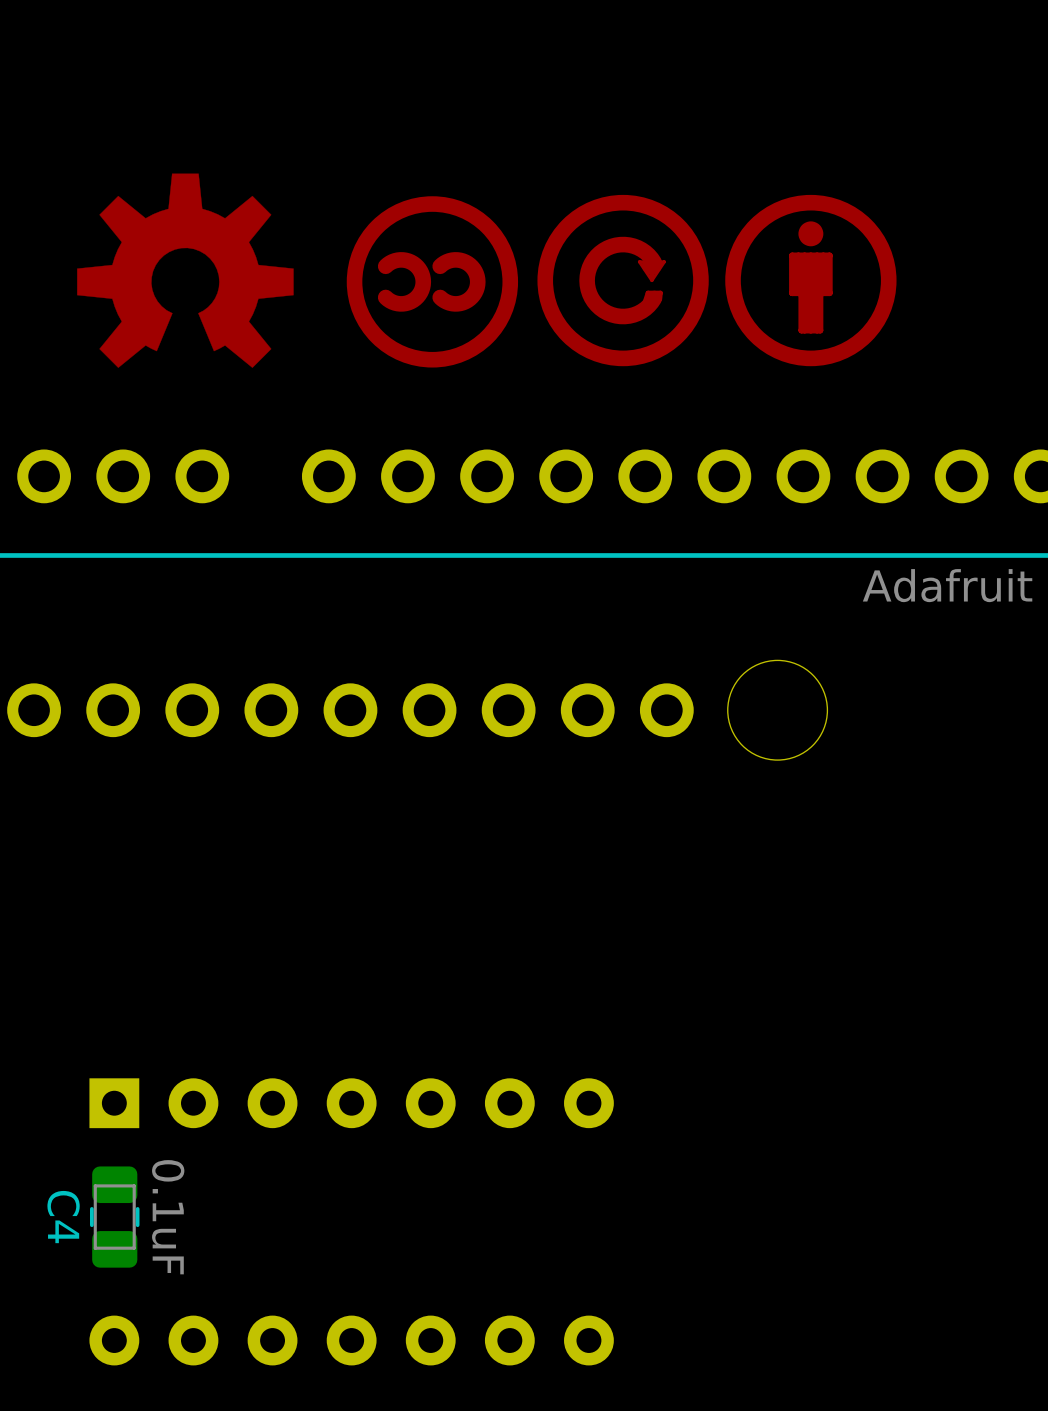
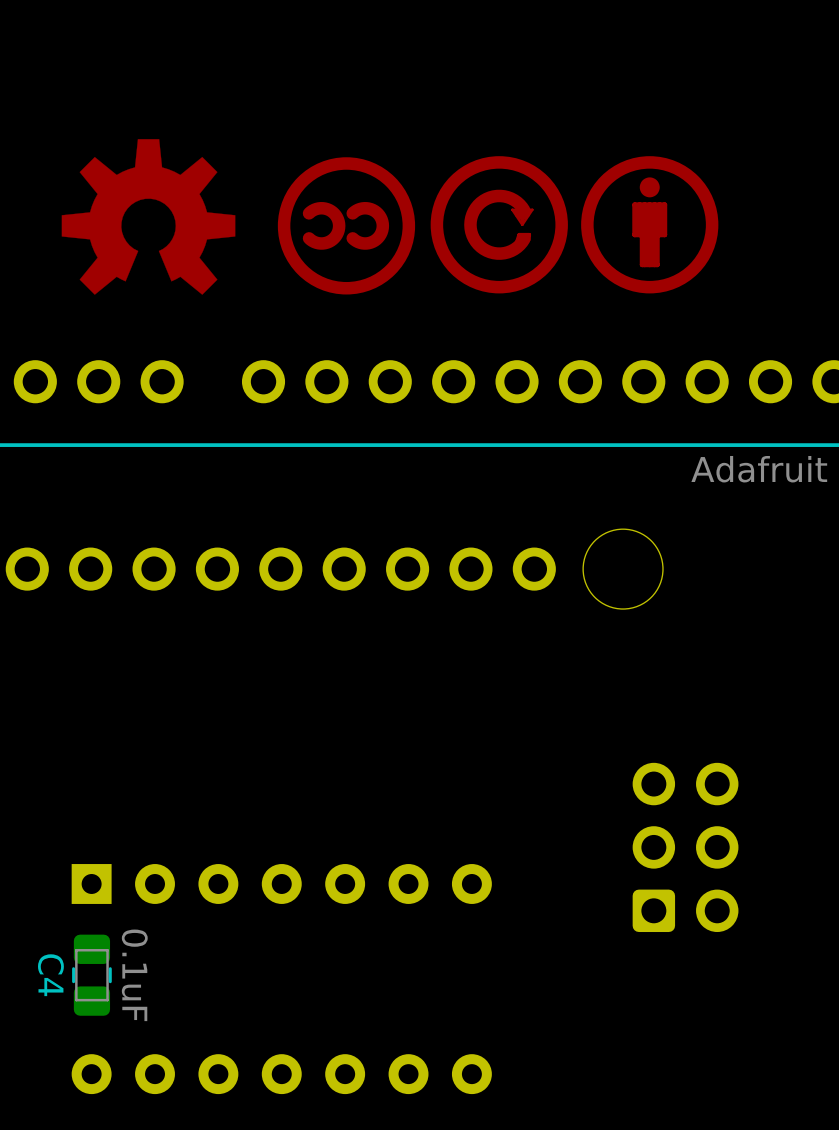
part: none -> (685, 847)

